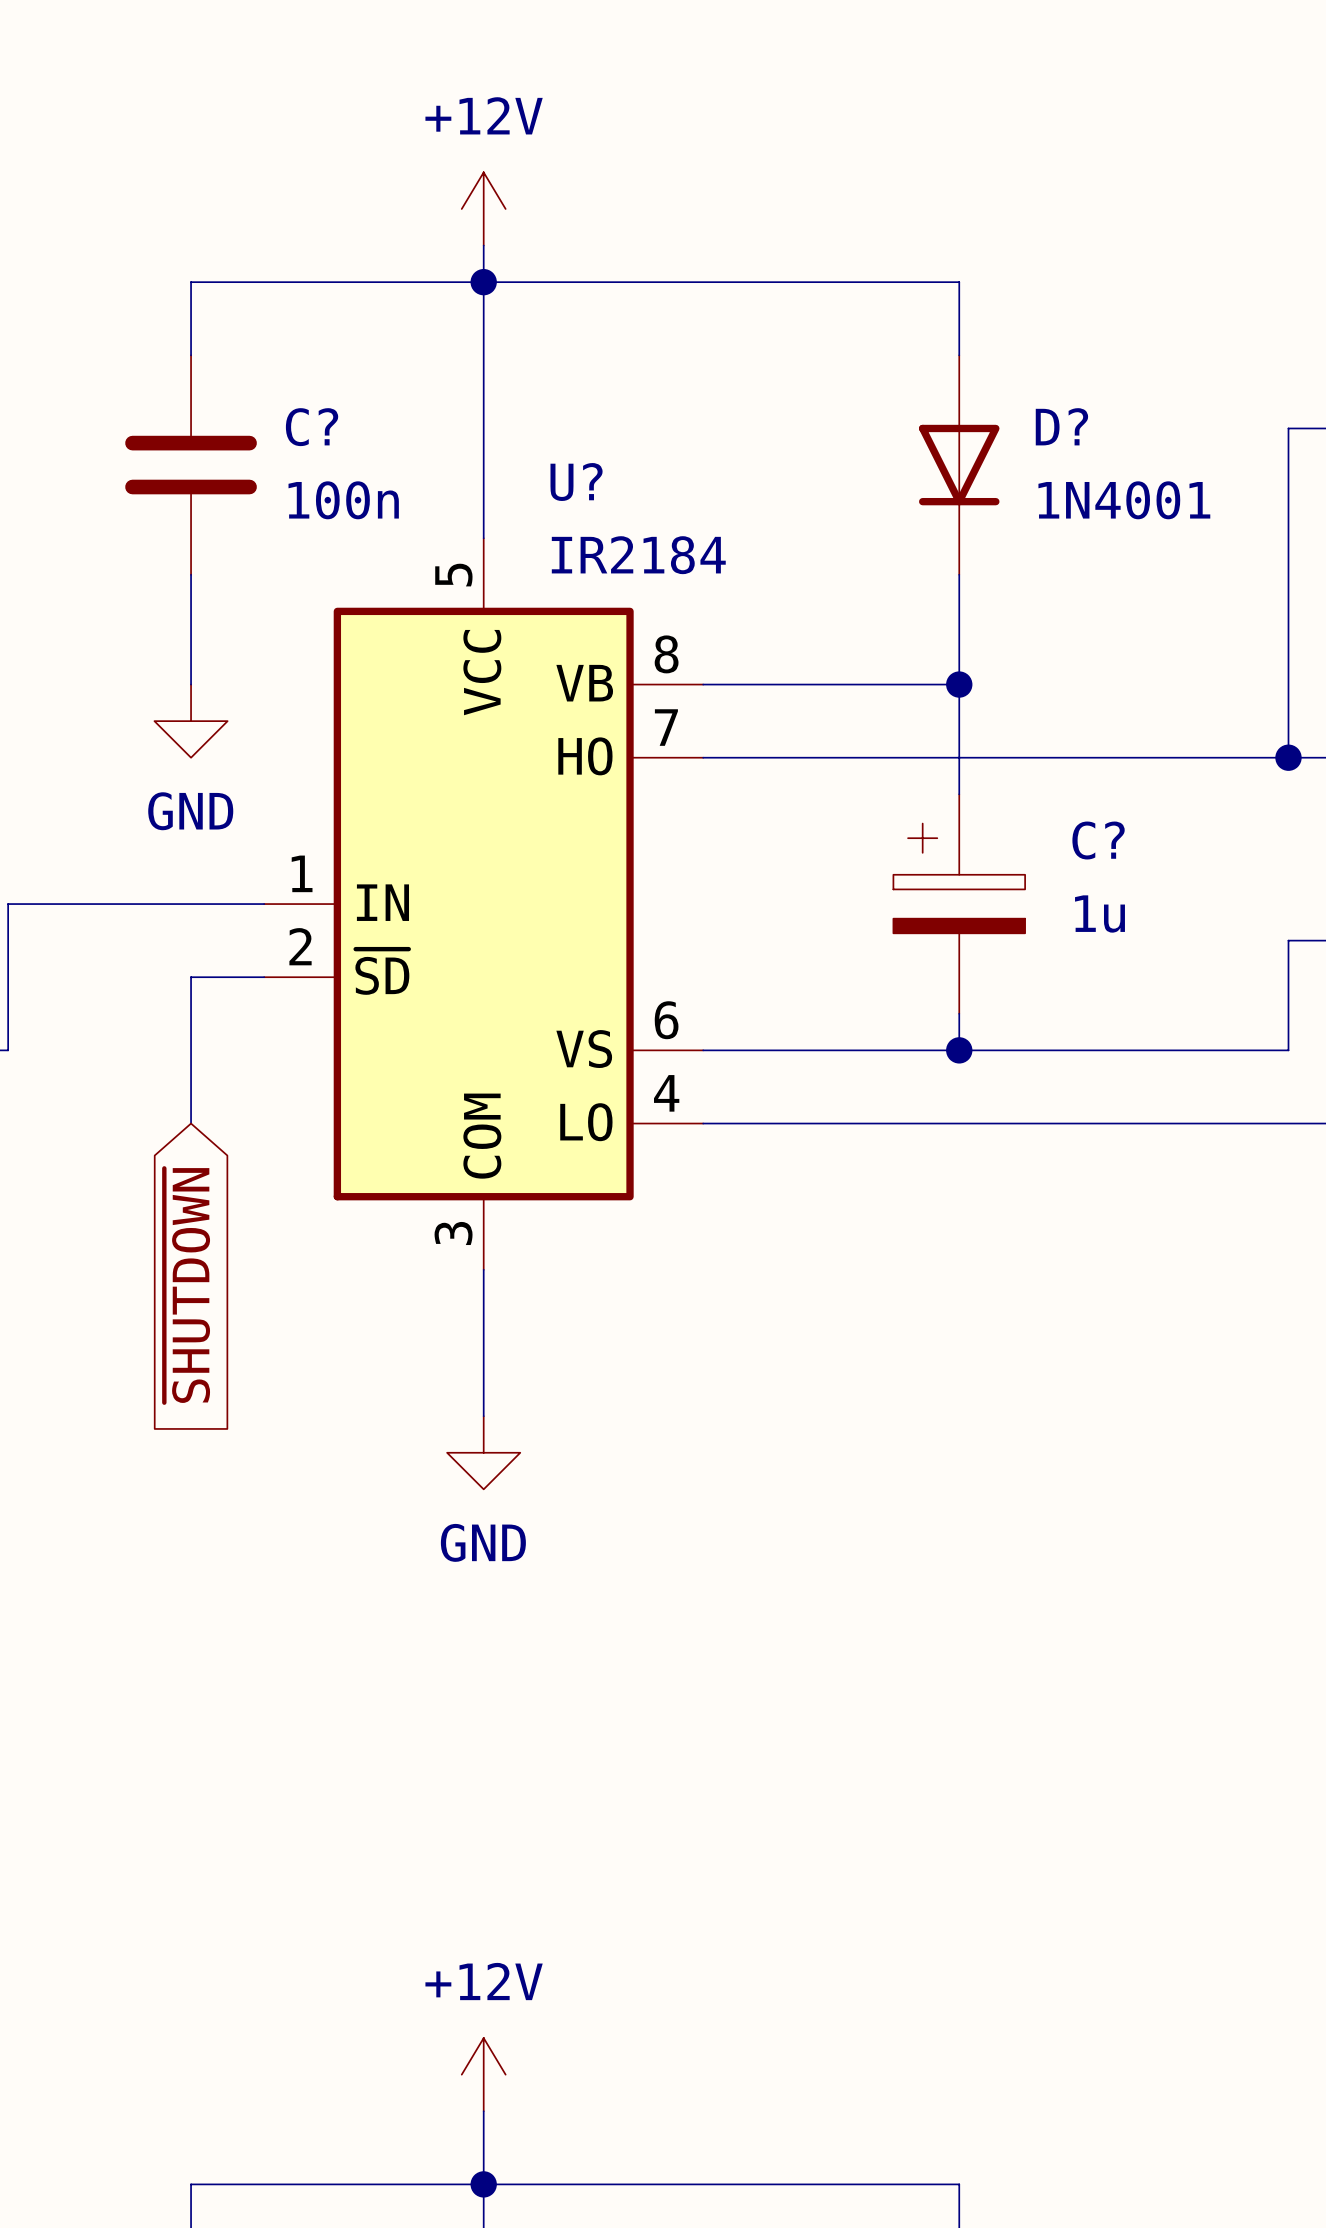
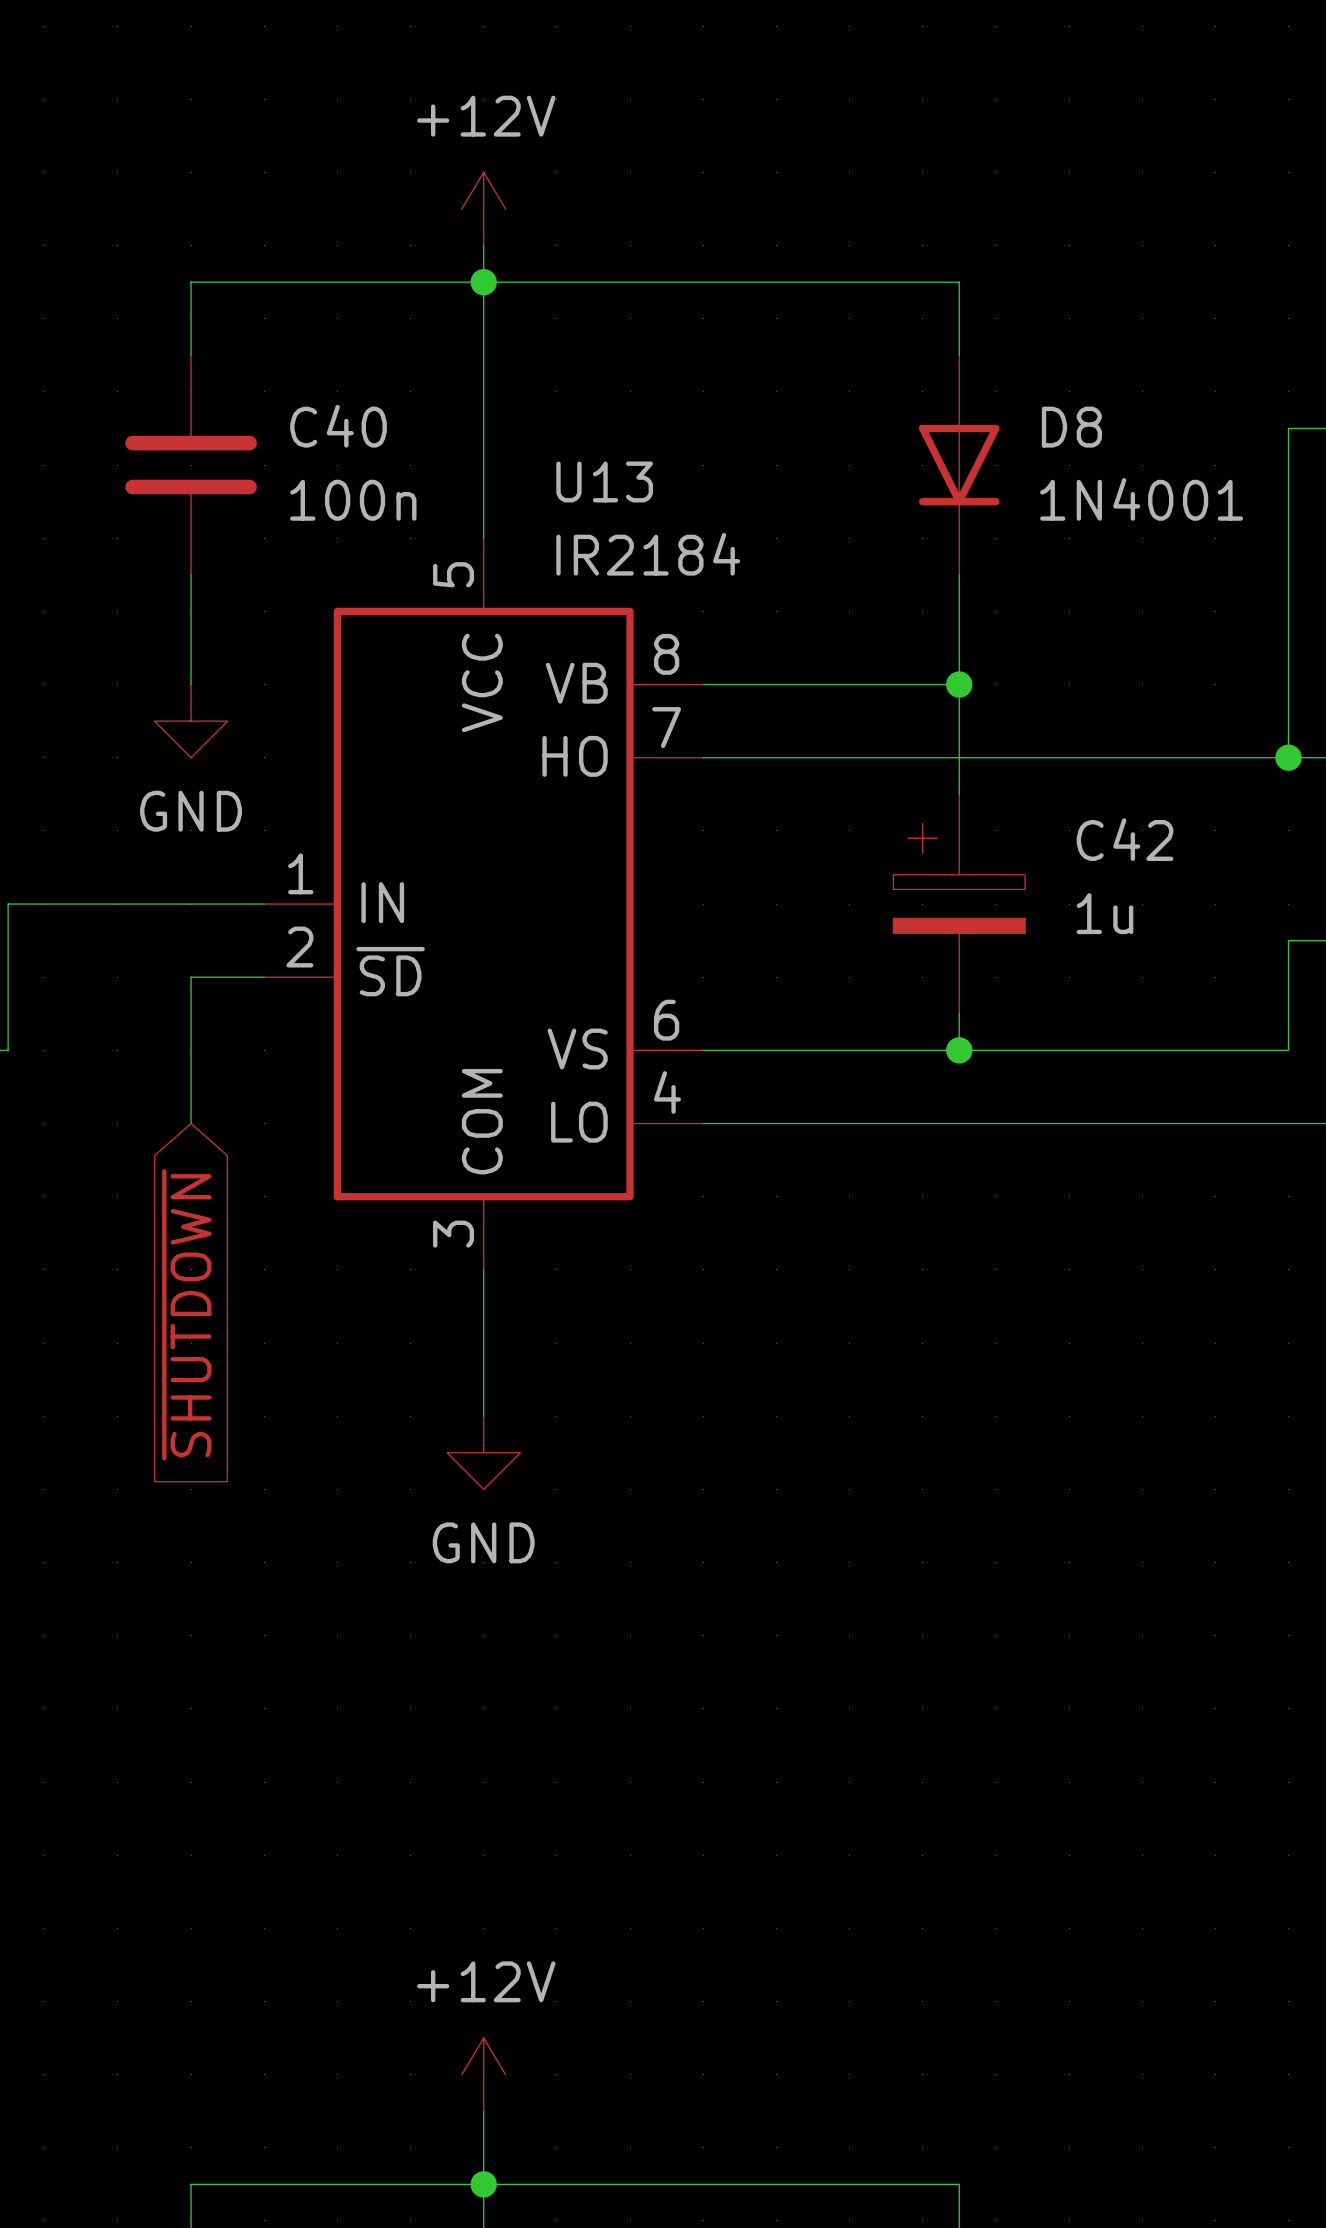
D? name: D? (1061, 426) -> D8 (1071, 427)
C? name: C? (312, 427) -> C40 (338, 426)
U? name: U? (576, 482) -> U13 (604, 481)
C? name: C? (1098, 840) -> C42 (1125, 839)

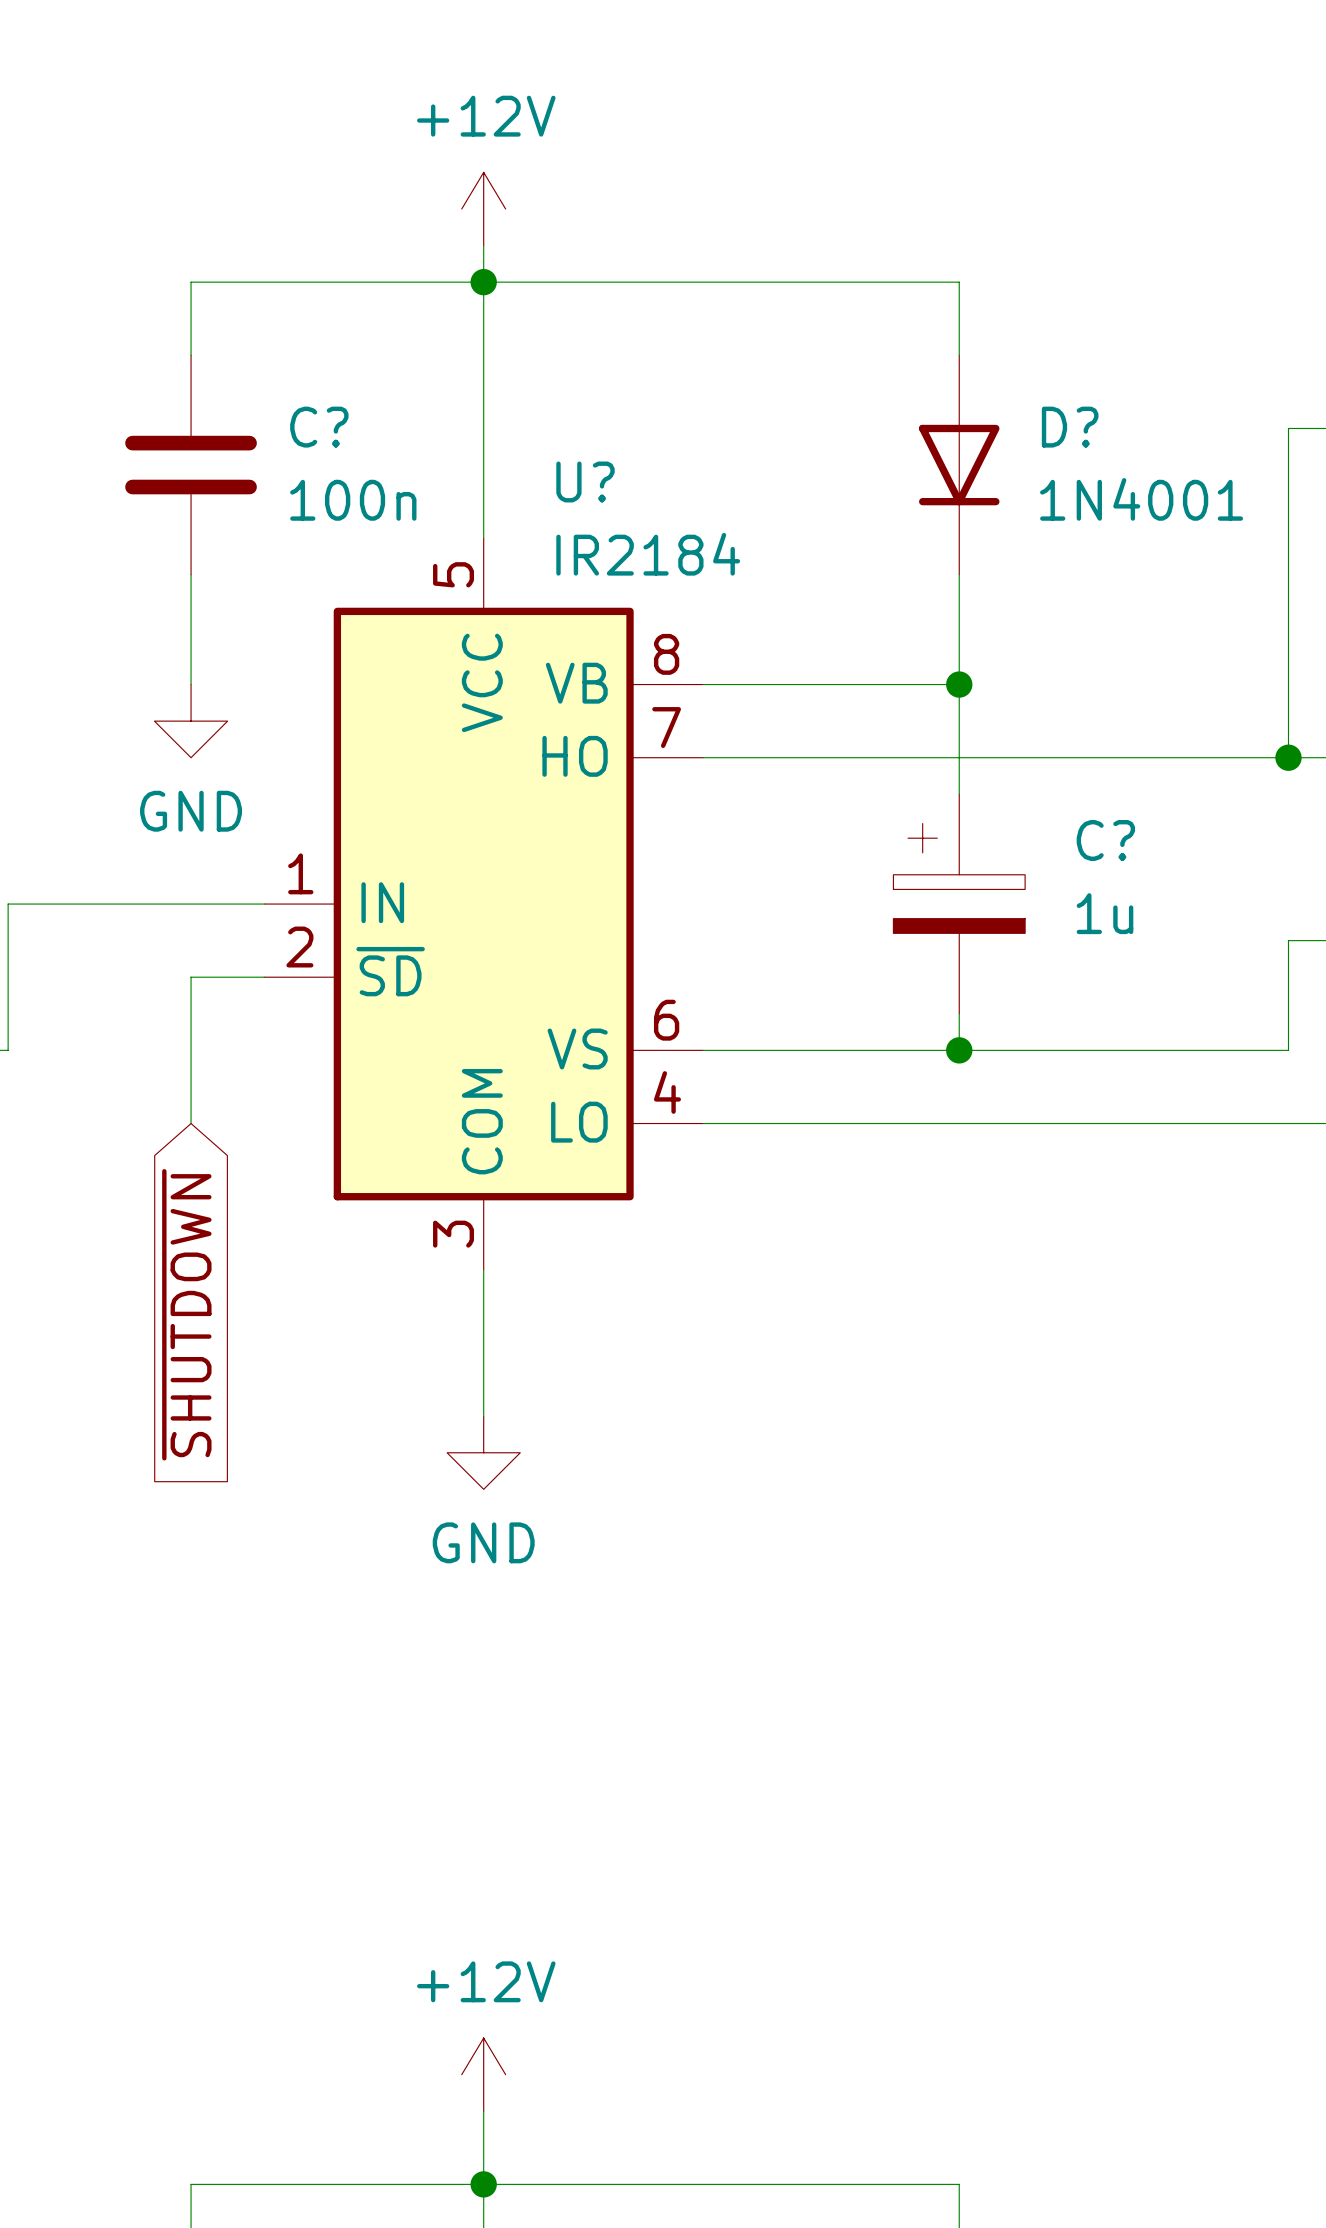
C40 name: C40 (338, 426) -> C? (319, 427)
D8 name: D8 (1071, 427) -> D? (1070, 427)
U13 name: U13 (604, 481) -> U? (585, 481)
C42 name: C42 (1125, 839) -> C? (1105, 840)

